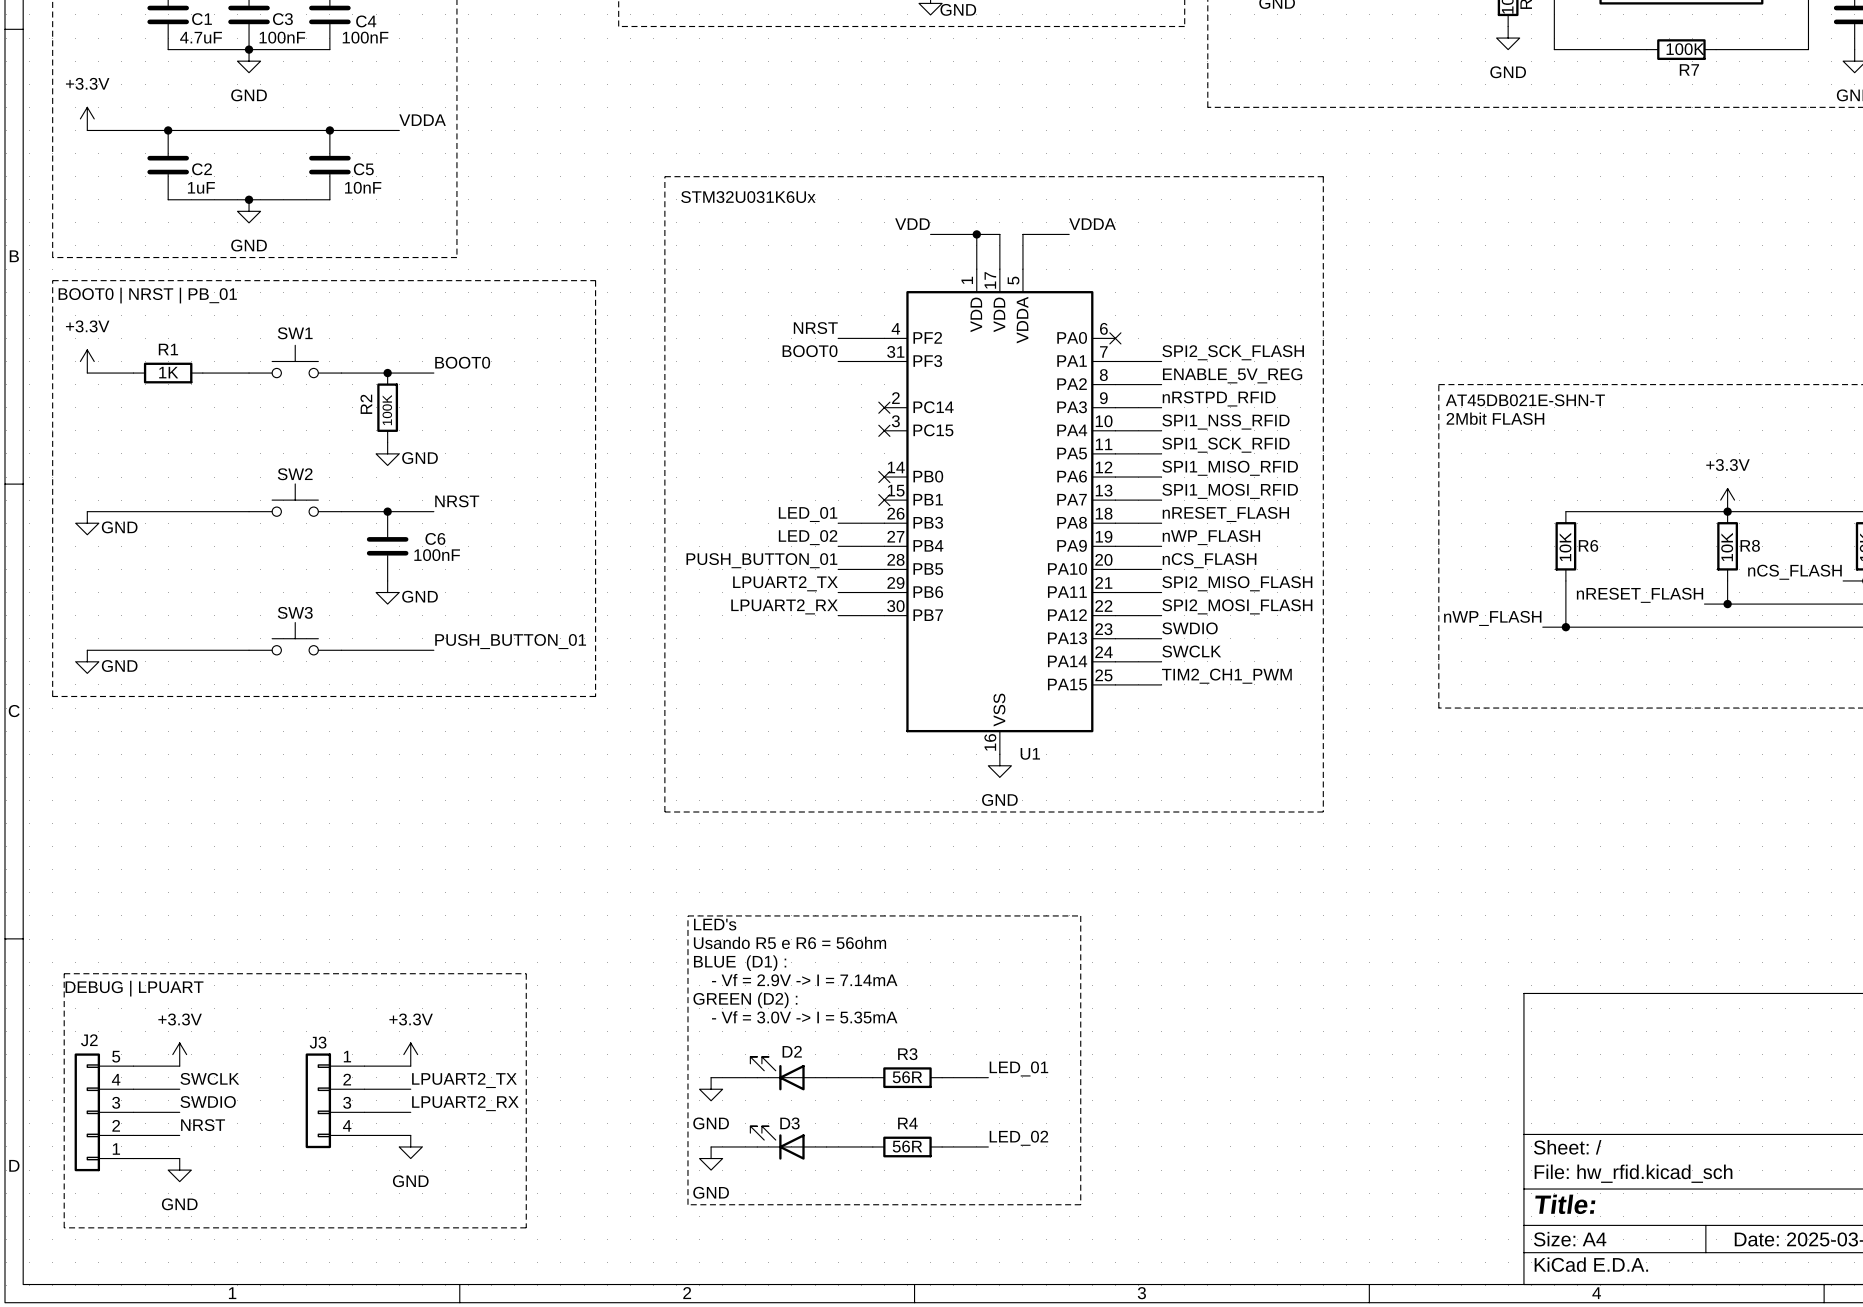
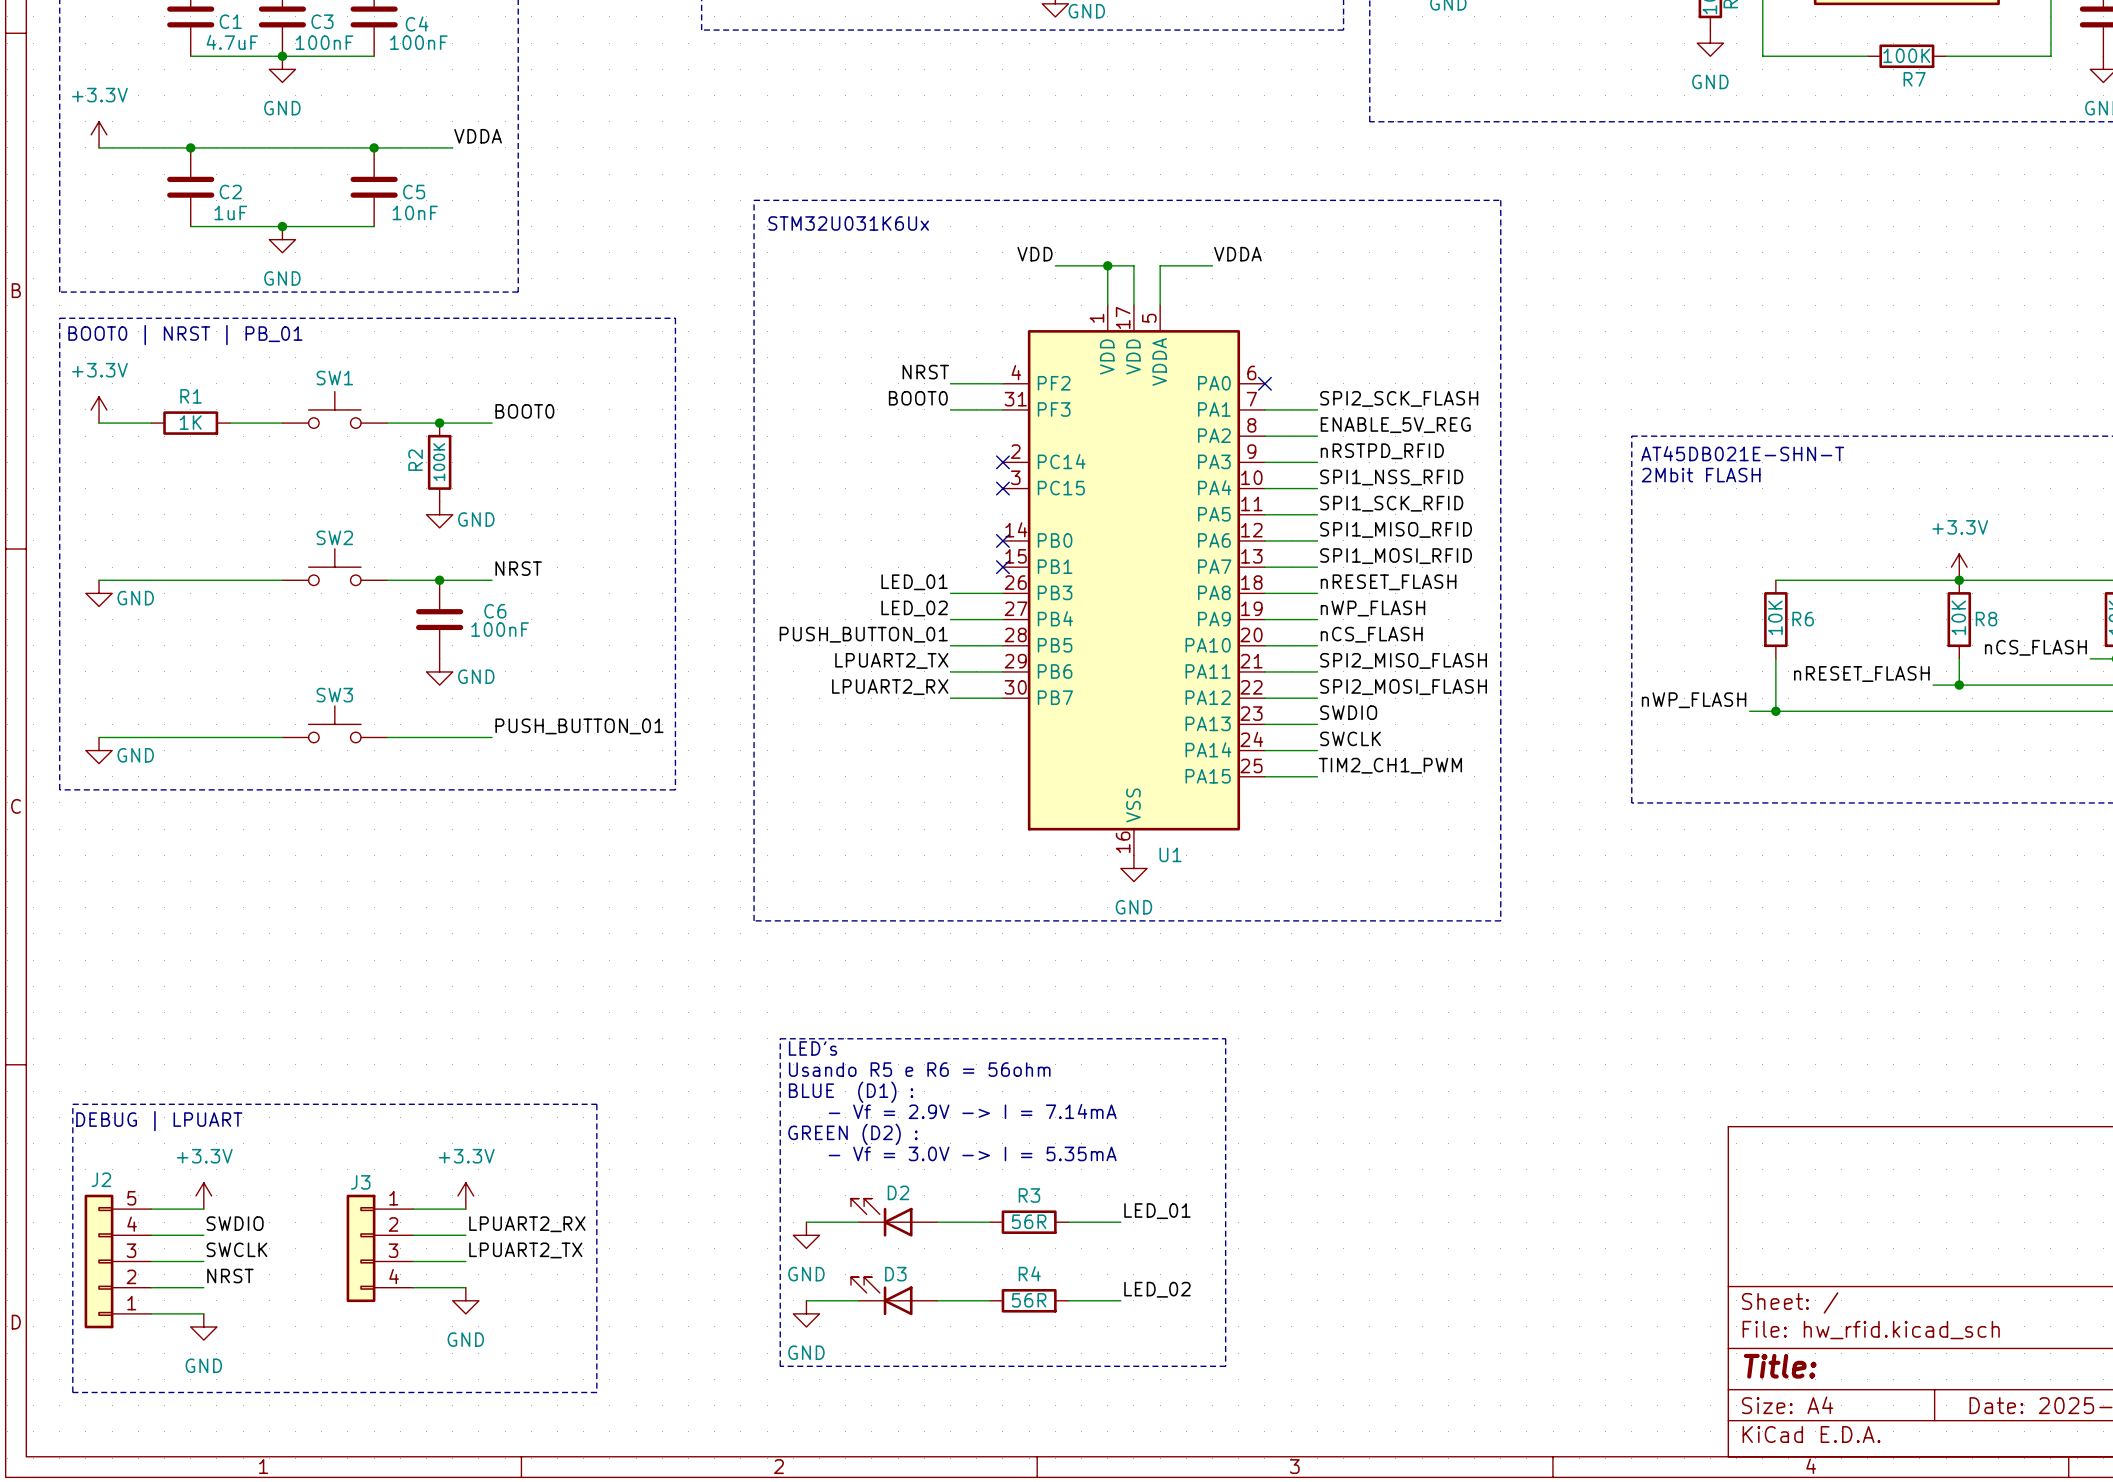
label: SWCLK (209, 1078) -> SWDIO (235, 1223)
label: LPUART2_TX (464, 1080) -> LPUART2_RX (527, 1224)
label: SWDIO (208, 1102) -> SWCLK (236, 1249)
label: LPUART2_RX (465, 1103) -> LPUART2_TX (525, 1250)

